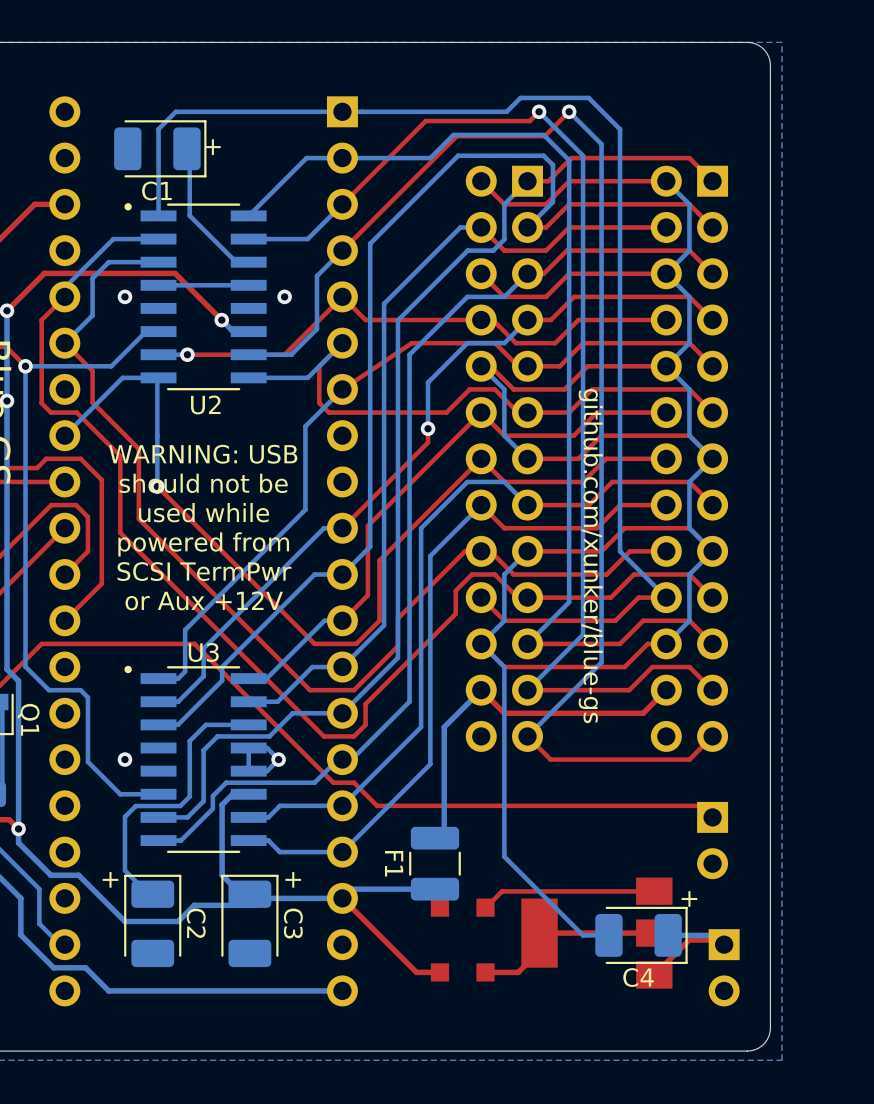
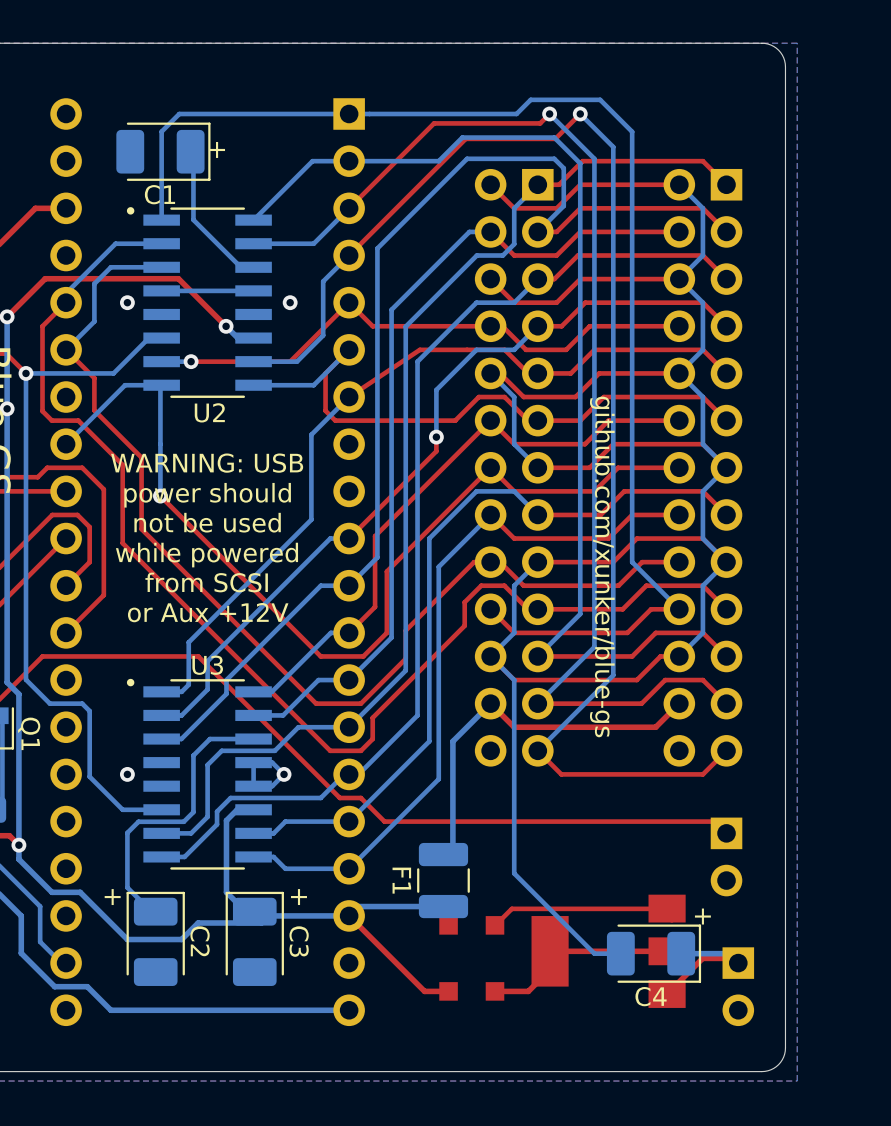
text: should not be (203, 483) -> power should (207, 495)
text: used while (204, 512) -> not be used (207, 522)
text: powered from (203, 544) -> while powered (206, 555)
text: SCSI TermPwr (204, 571) -> from SCSI (206, 582)

